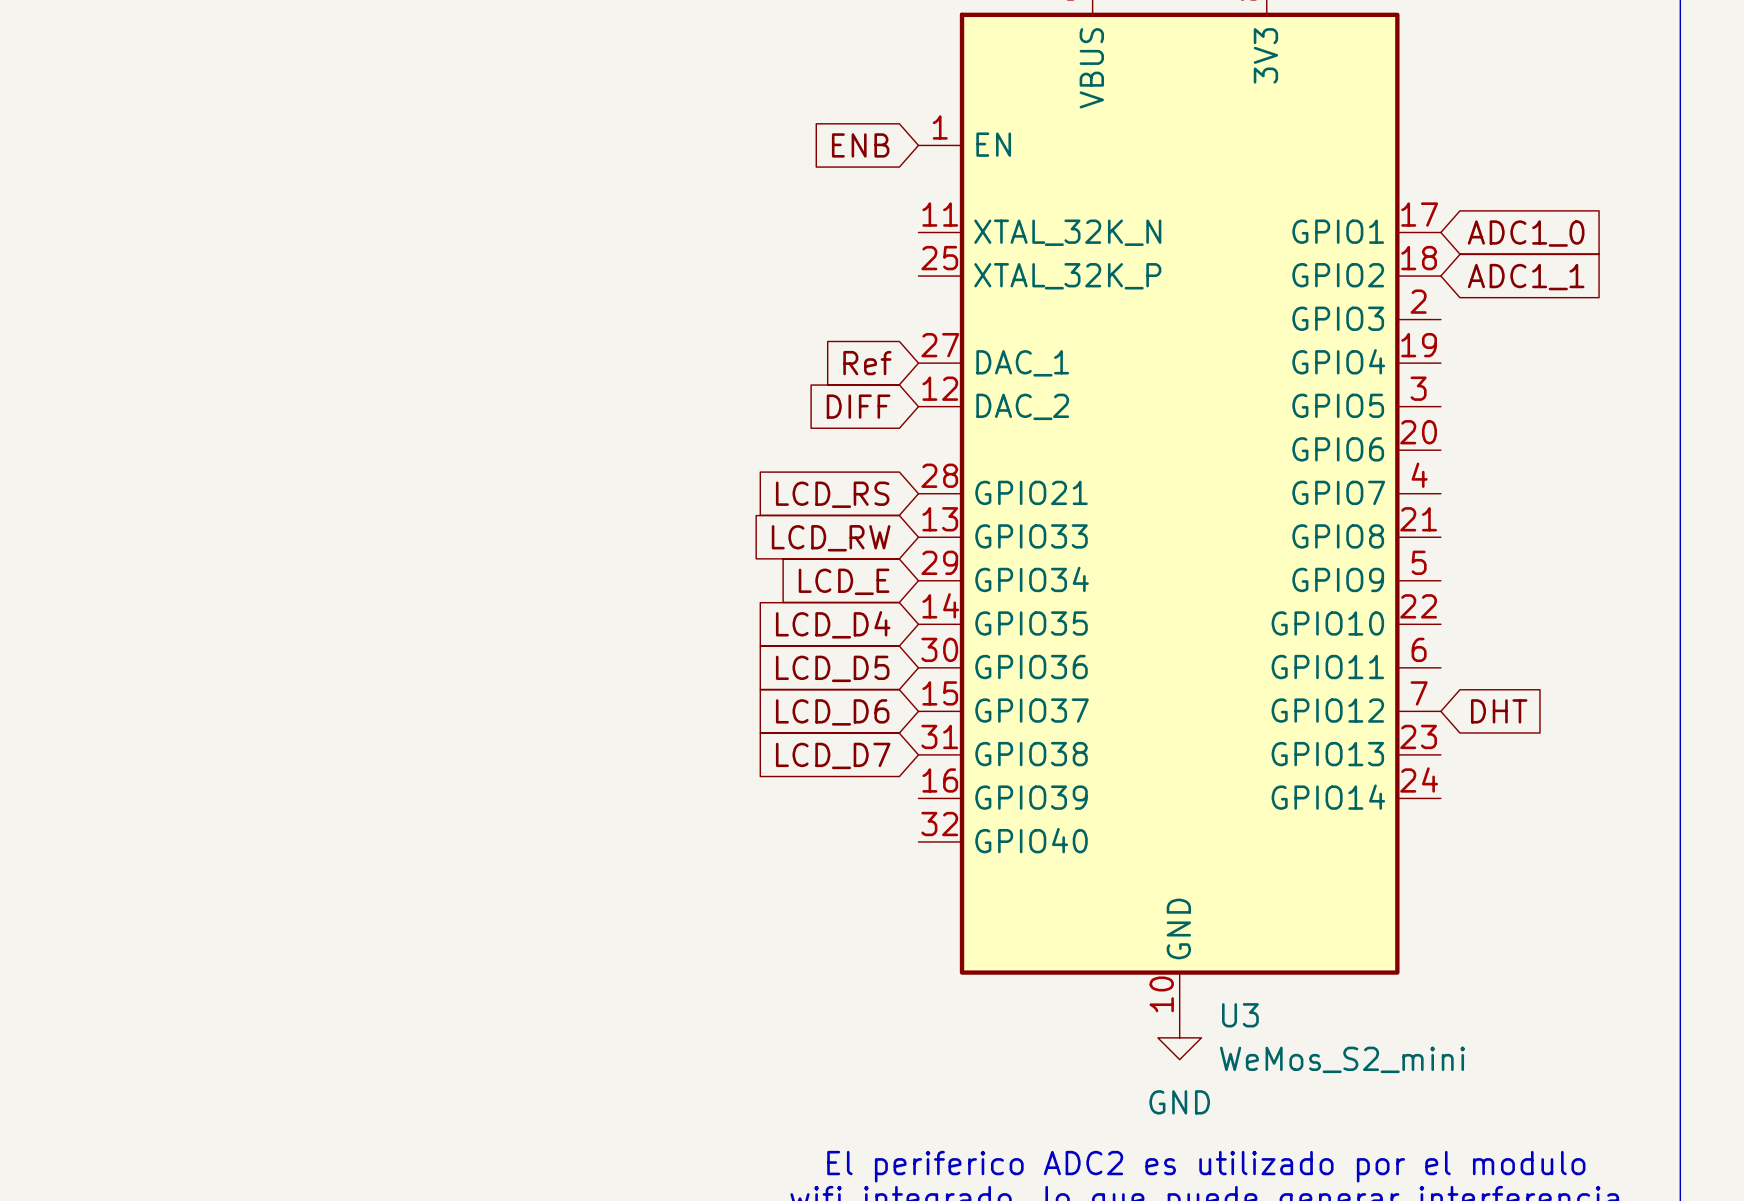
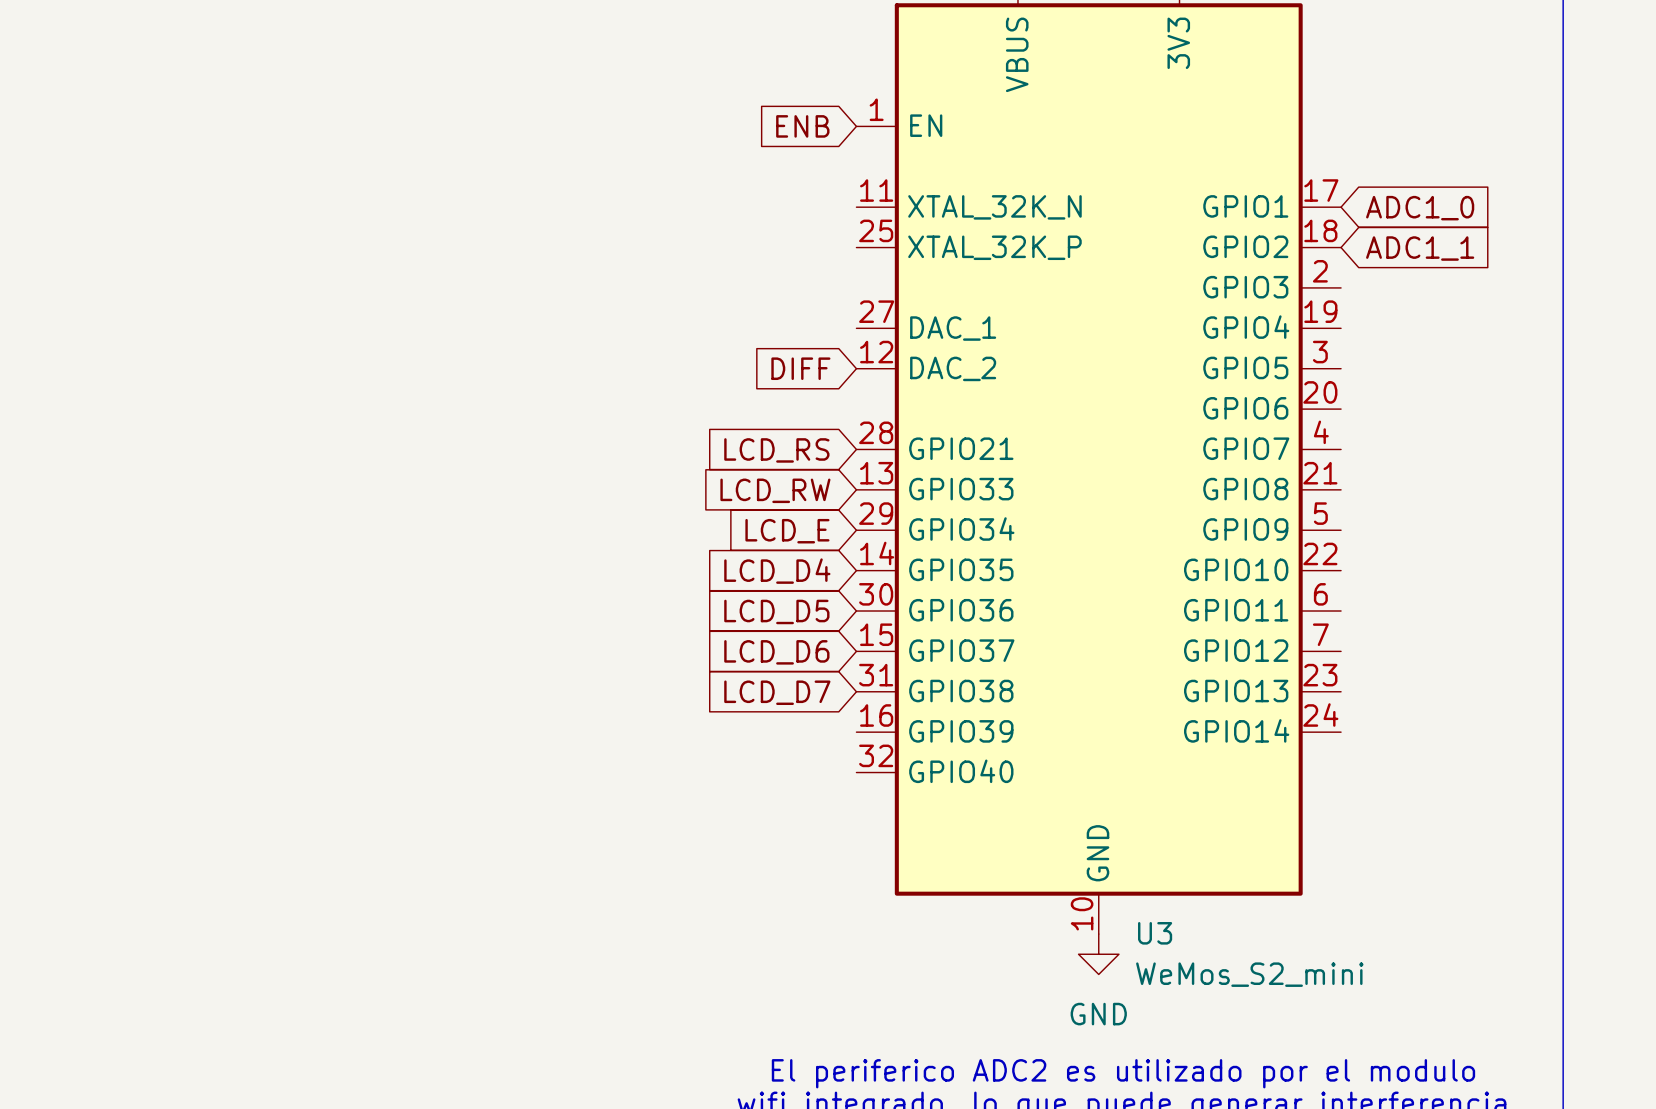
global label: Ref (867, 363) -> none
global label: DHT (1499, 711) -> none

